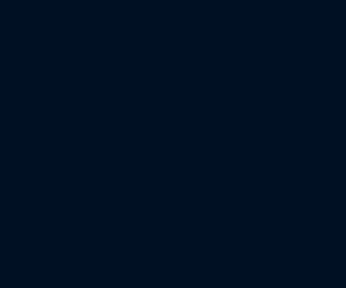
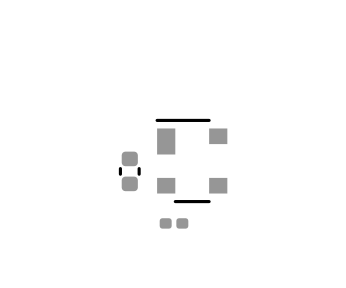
part: none -> (191, 161)
part: none -> (129, 171)
part: none -> (174, 223)

